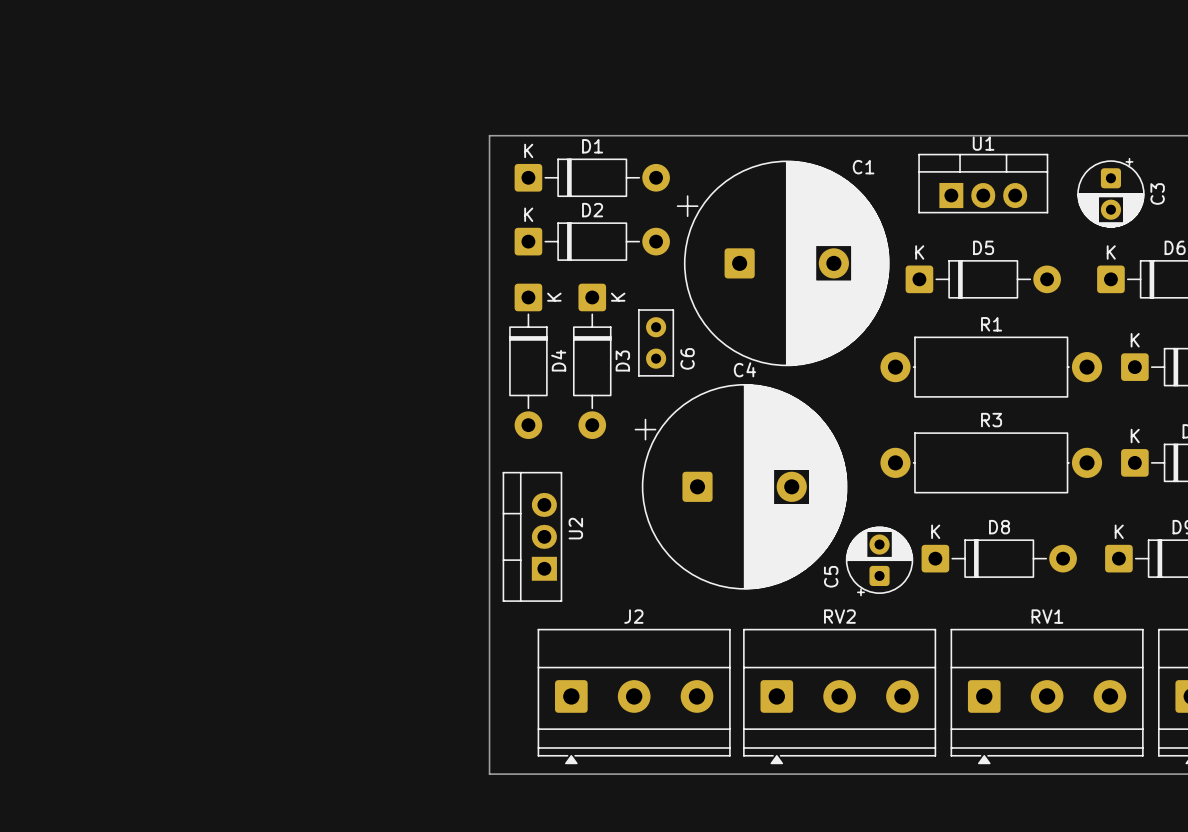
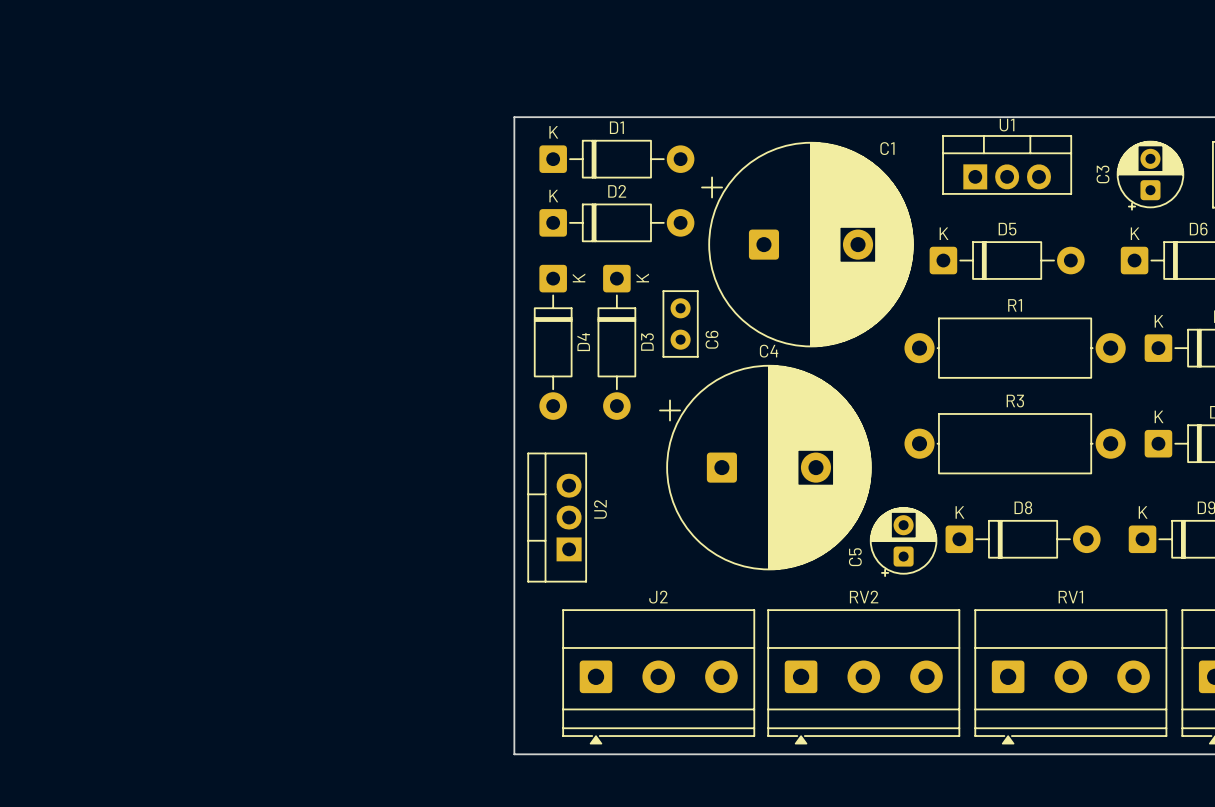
C3 rotation: 0° (1110, 192) -> 180° (1150, 175)

